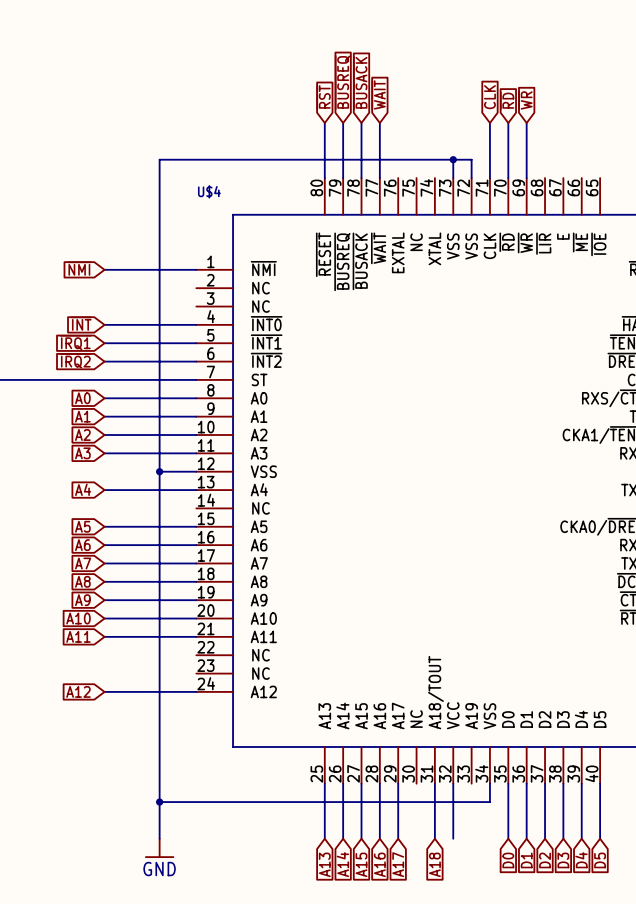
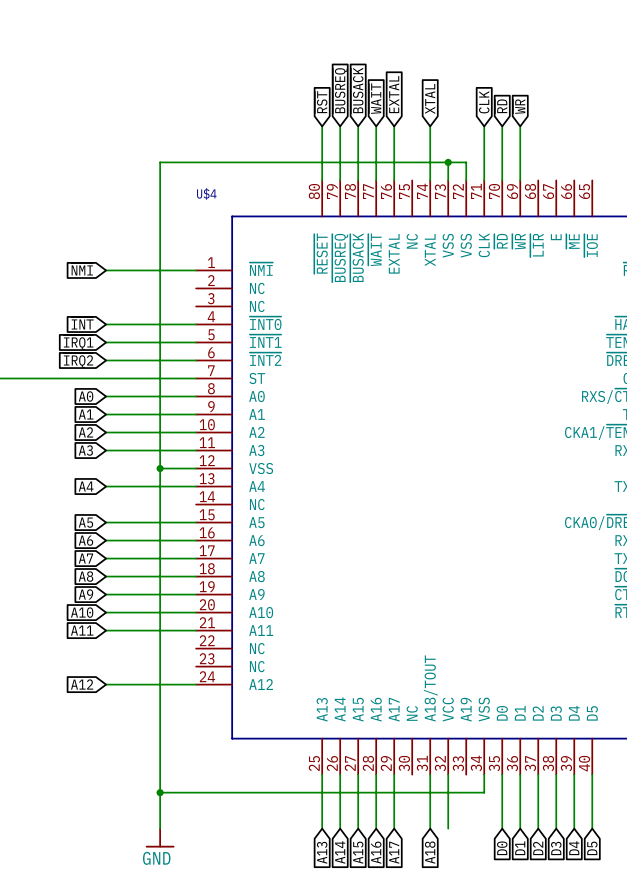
global label: none -> EXTAL (394, 94)
global label: none -> XTAL (430, 98)
wire: none -> (394, 126) (394, 180)
wire: none -> (430, 126) (430, 180)

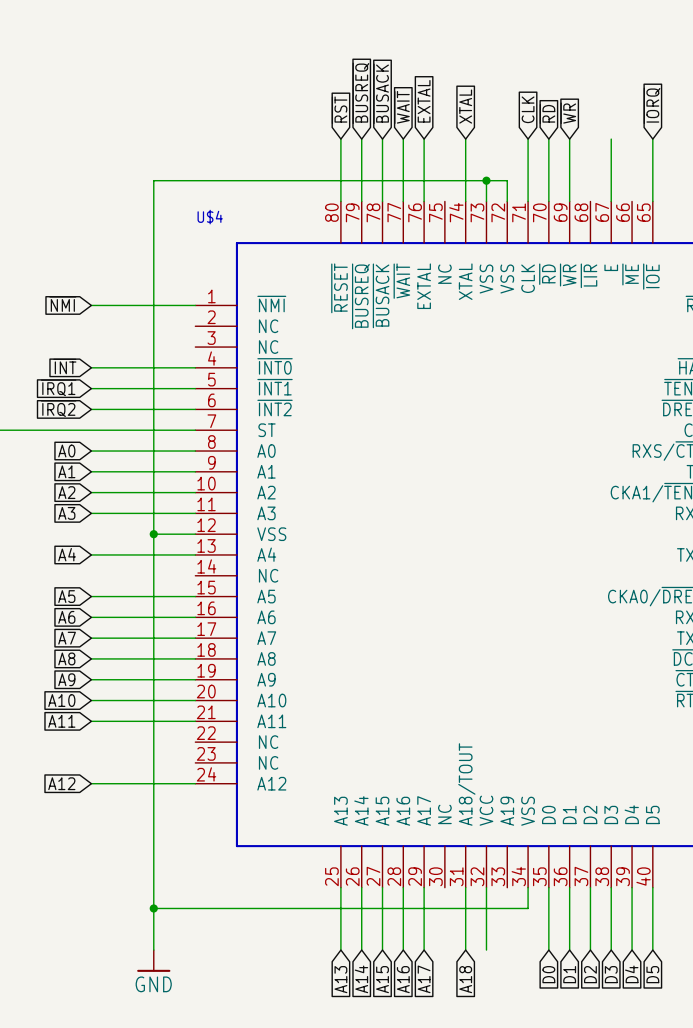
global label: none -> ~{IORQ} (652, 105)
wire: none -> (611, 139) (611, 201)
wire: none -> (652, 139) (652, 201)

